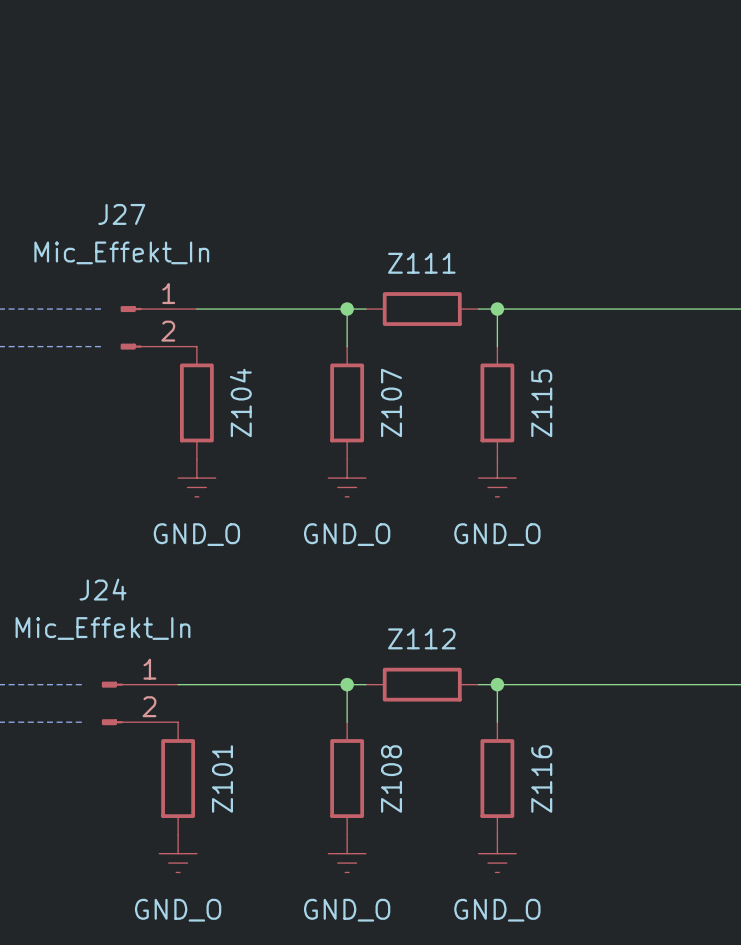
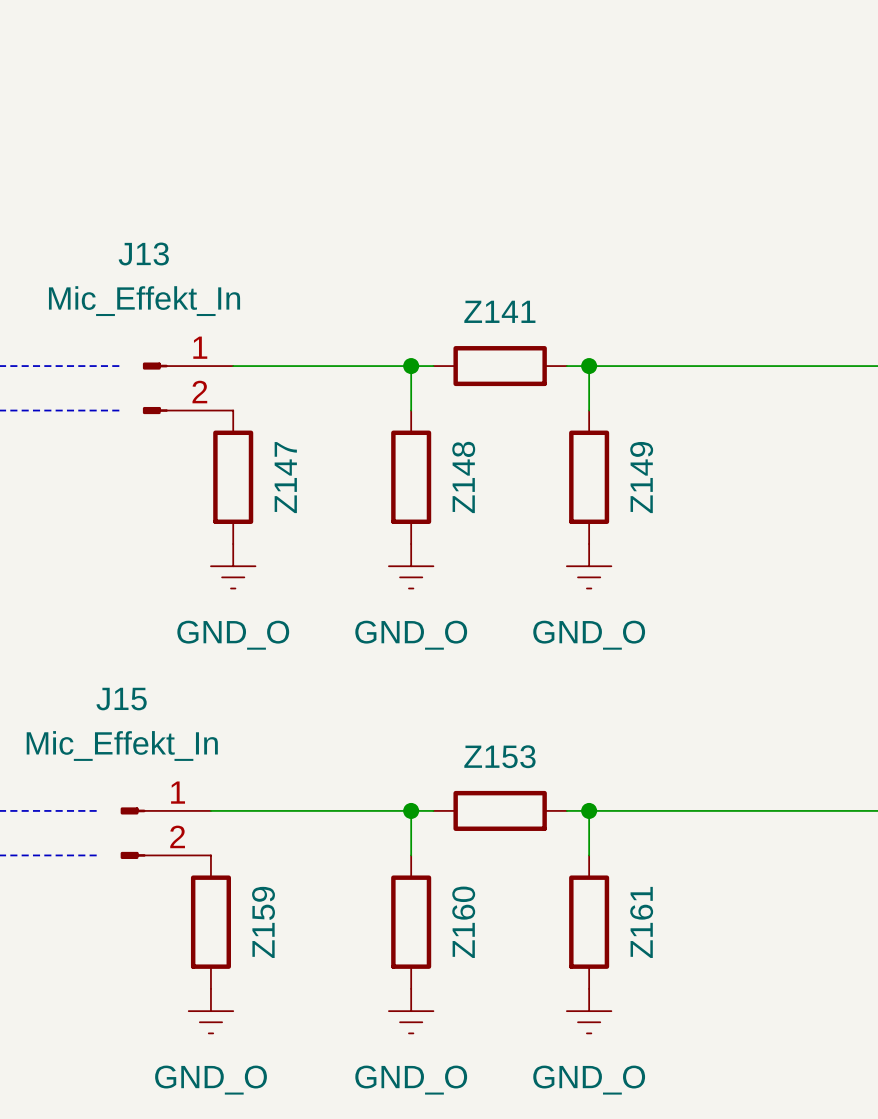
J27 name: J27 (121, 214) -> J13 (143, 253)
Z111 name: Z111 (421, 263) -> Z141 (499, 311)
Z104 name: Z104 (240, 402) -> Z147 (285, 477)
Z107 name: Z107 (391, 402) -> Z148 (463, 477)
Z115 name: Z115 (541, 403) -> Z149 (641, 477)
J24 name: J24 (102, 589) -> J15 (121, 699)
Z112 name: Z112 (421, 638) -> Z153 (499, 756)
Z101 name: Z101 (222, 779) -> Z159 (263, 922)
Z108 name: Z108 (391, 779) -> Z160 (463, 922)
Z116 name: Z116 (541, 779) -> Z161 (641, 922)

